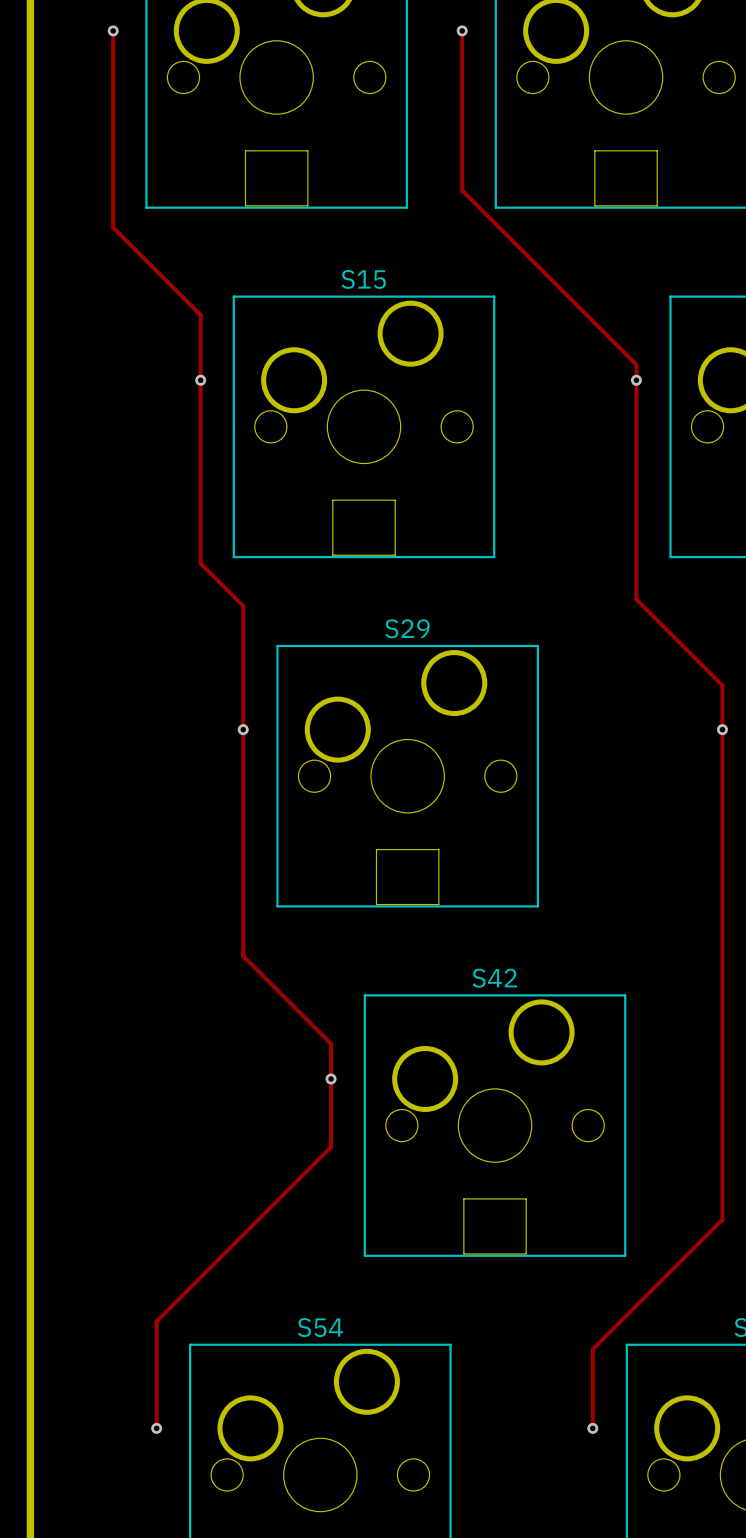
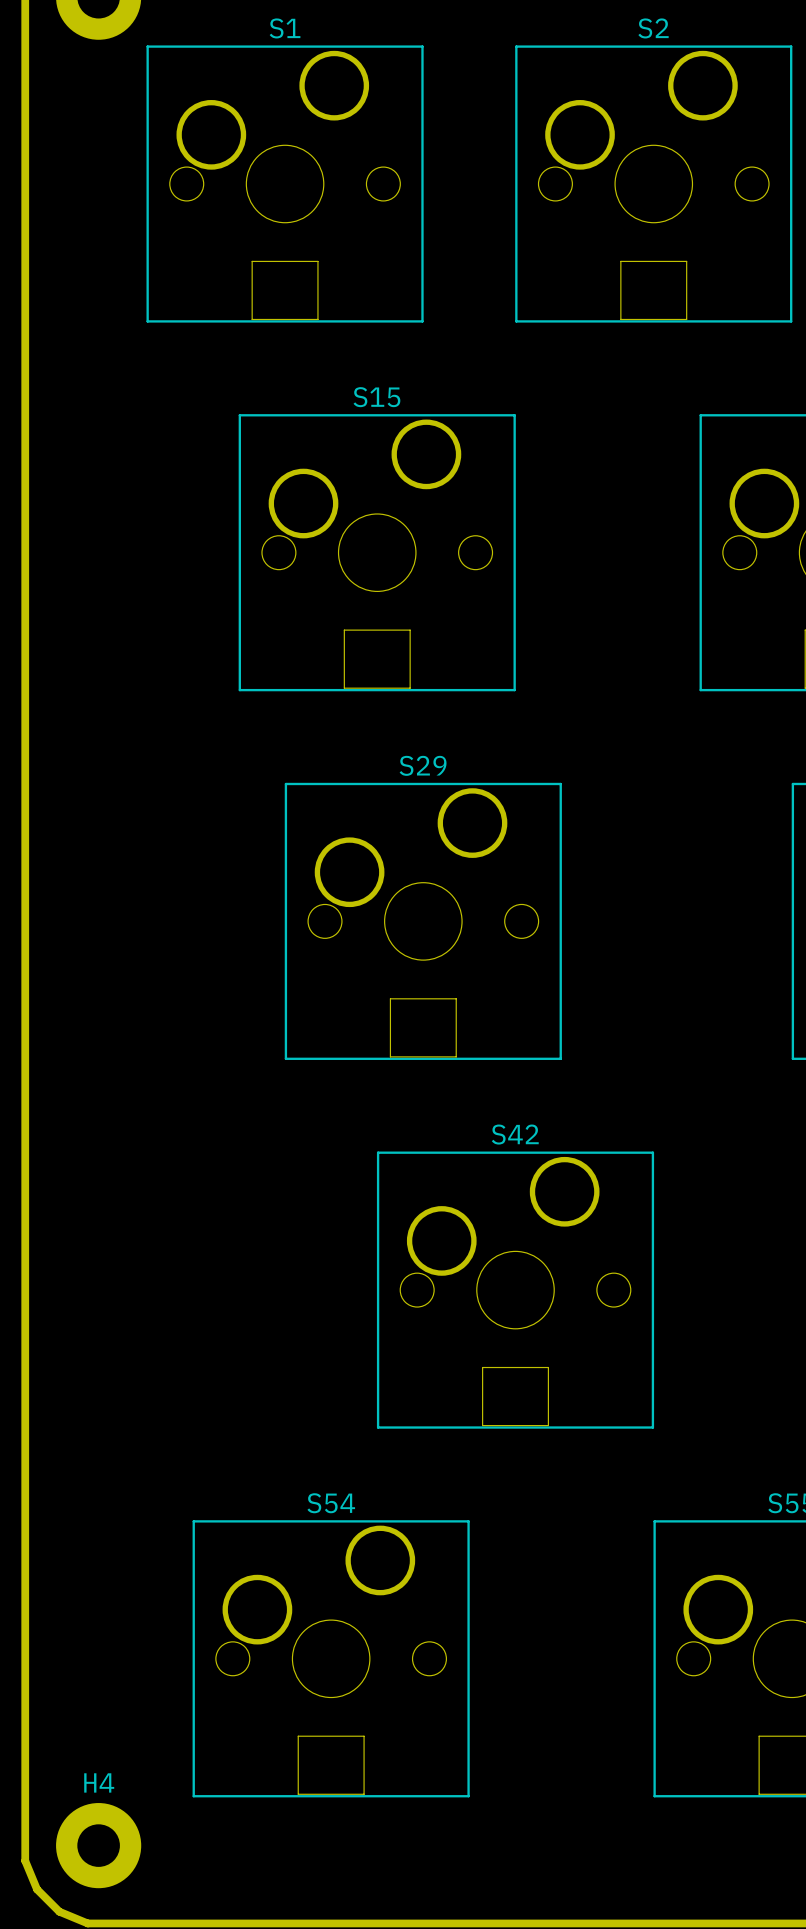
track: (113, 30) (113, 227) (200, 315) (200, 563) (243, 606) (243, 955) (331, 1043) (331, 1147) (156, 1321) (156, 1428) -> none
via: (113, 30) -> none
track: (462, 30) (462, 190) (636, 364) (636, 599) (722, 685) (722, 1219) (592, 1349) (592, 1428) -> none
via: (462, 30) -> none
via: (200, 380) -> none
via: (636, 380) -> none
via: (243, 729) -> none
via: (722, 729) -> none
via: (331, 1079) -> none
via: (156, 1428) -> none
via: (592, 1428) -> none

